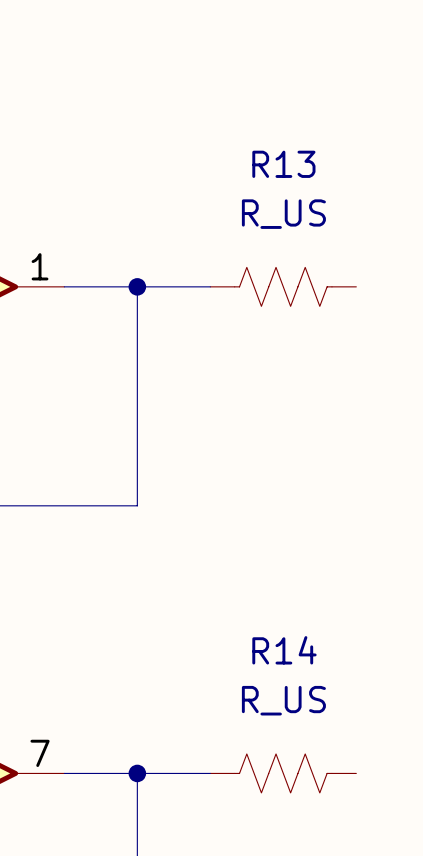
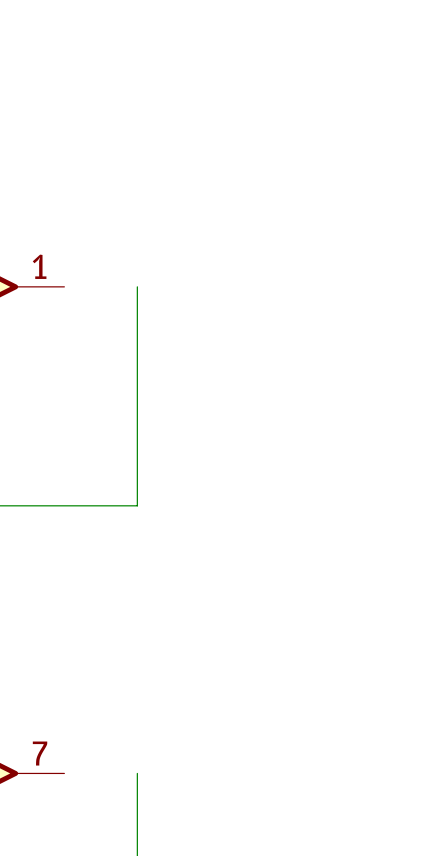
wire: (64, 286) (210, 286) -> none
junction: (137, 286) -> none
R13: R_US (283, 286) -> none
wire: (64, 773) (210, 773) -> none
junction: (137, 773) -> none
R14: R_US (283, 773) -> none

